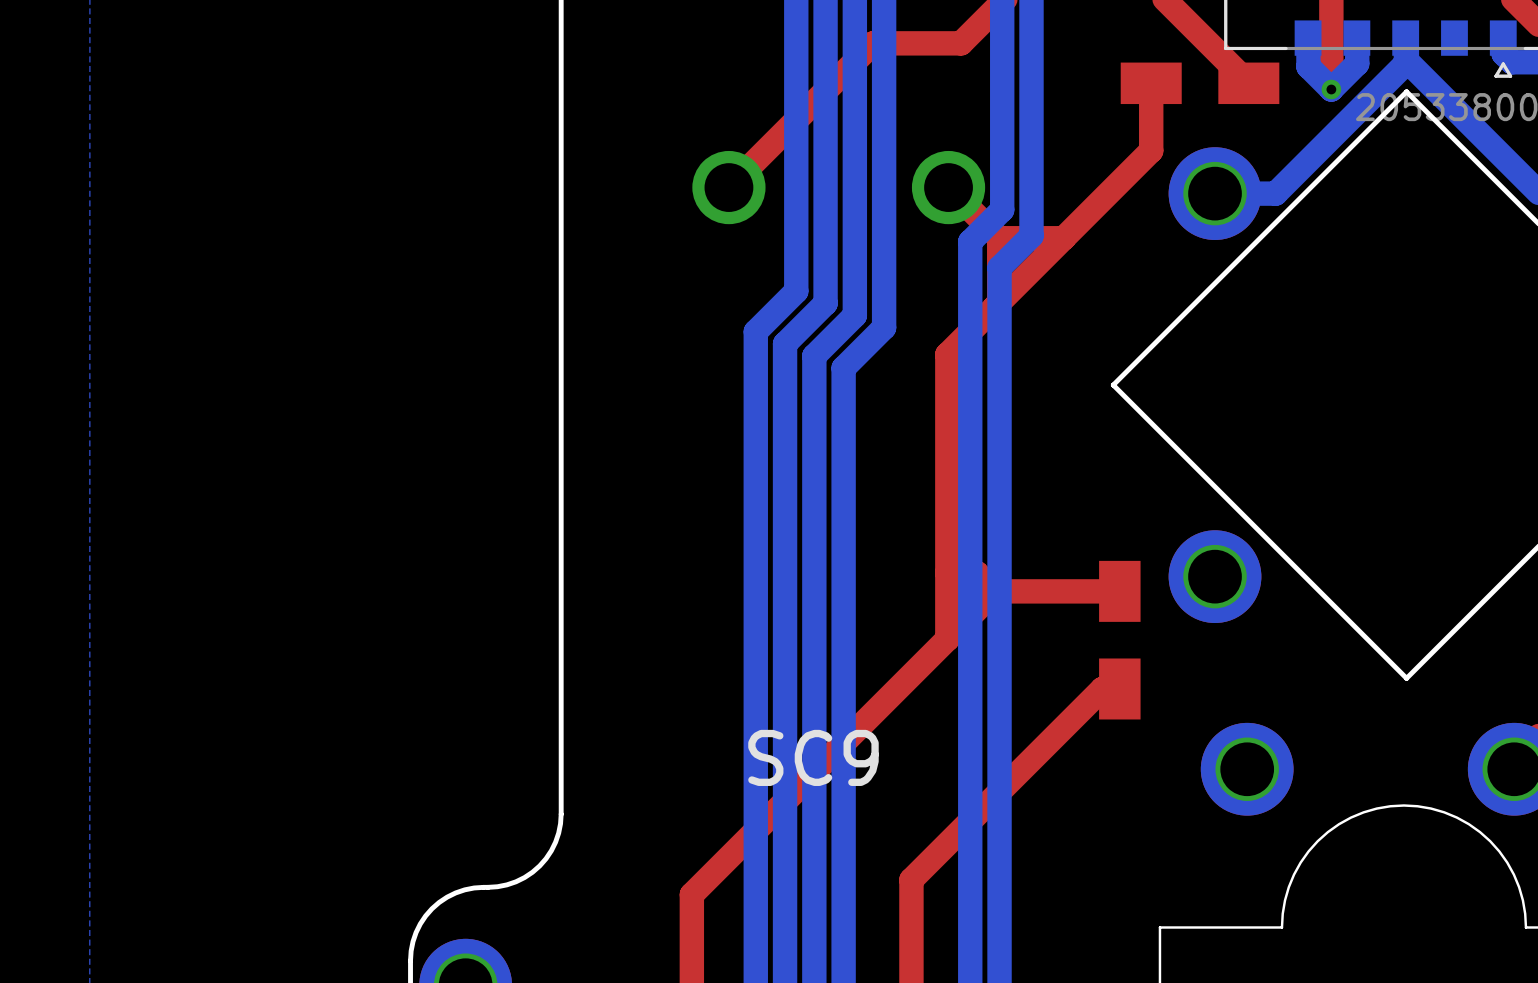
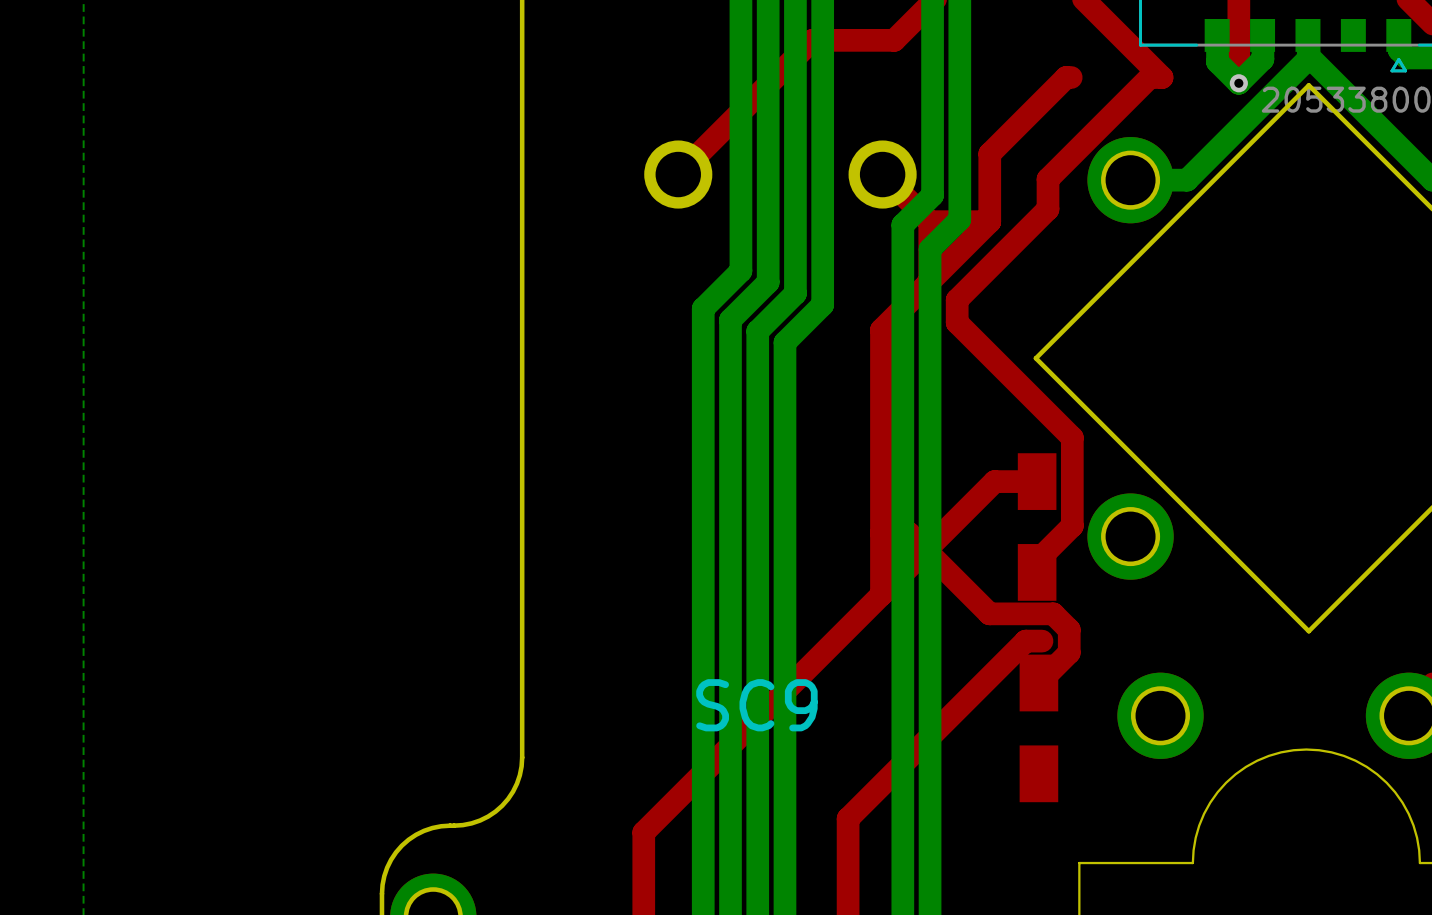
top track: (1151, 83) (1151, 150) (1063, 238) -> (1071, 77) (1066, 77) (989, 153) (989, 221)
part: (1200, 83) -> none
top track: none -> (1162, 77) (1149, 77) (1048, 179) (1048, 209) (957, 299) (957, 322) (1072, 437) (1072, 525) (1037, 561) (1037, 572)
top track: none -> (1037, 481) (994, 481) (925, 550) (989, 613) (1053, 613) (1069, 629) (1069, 652) (1038, 682)
part: none -> (1037, 527)
top track: (1119, 591) (995, 591) -> none
part: (1119, 640) -> none
part: none -> (1038, 728)

